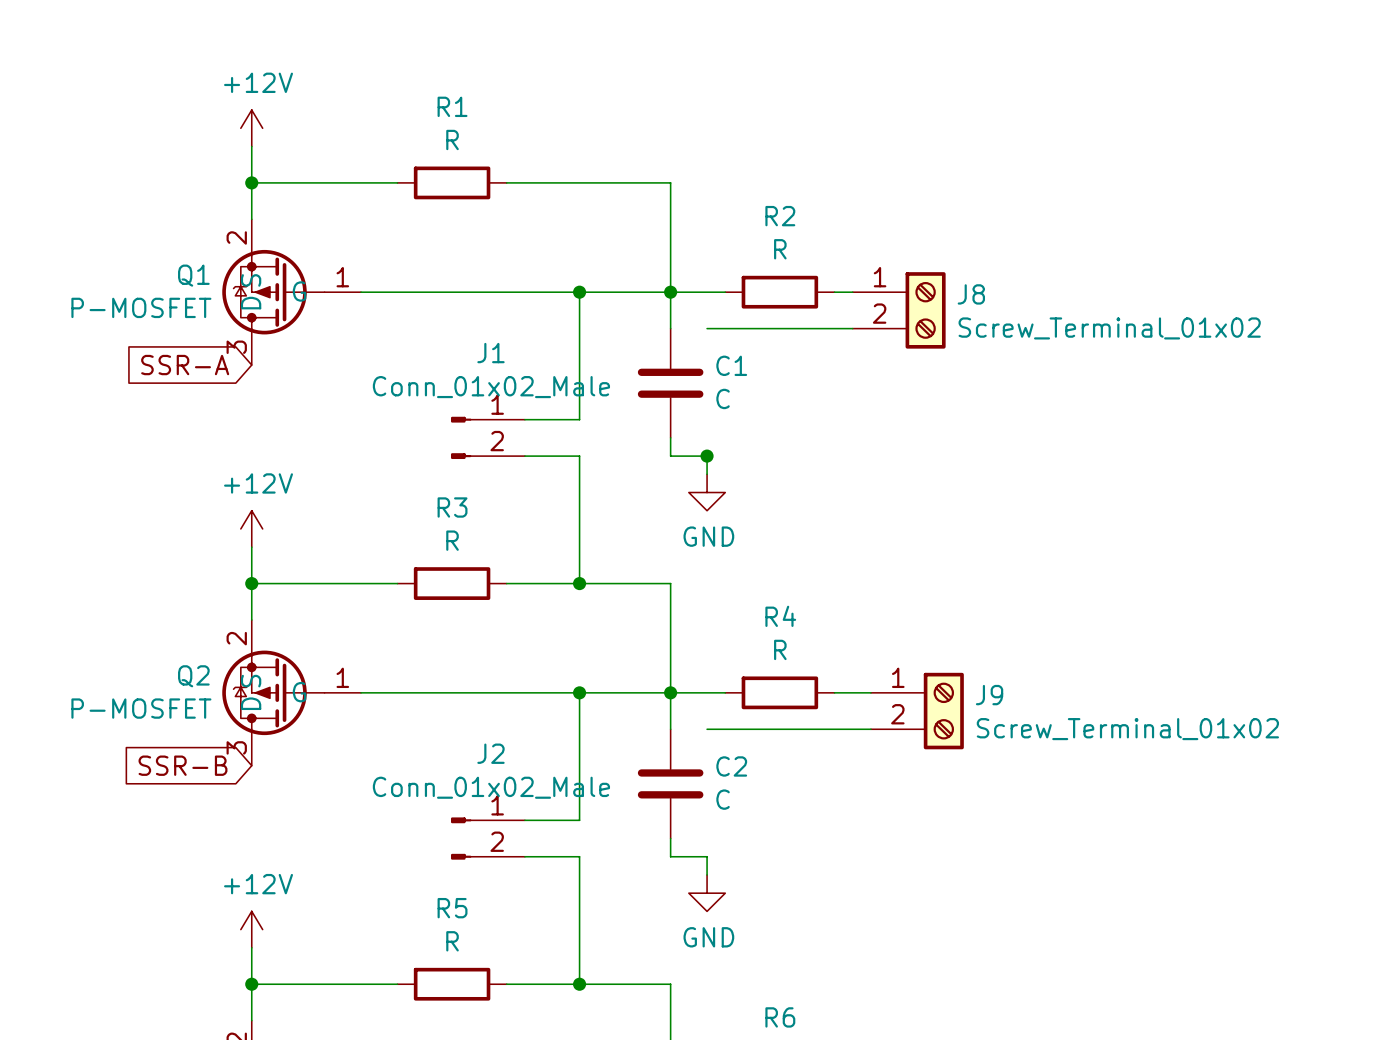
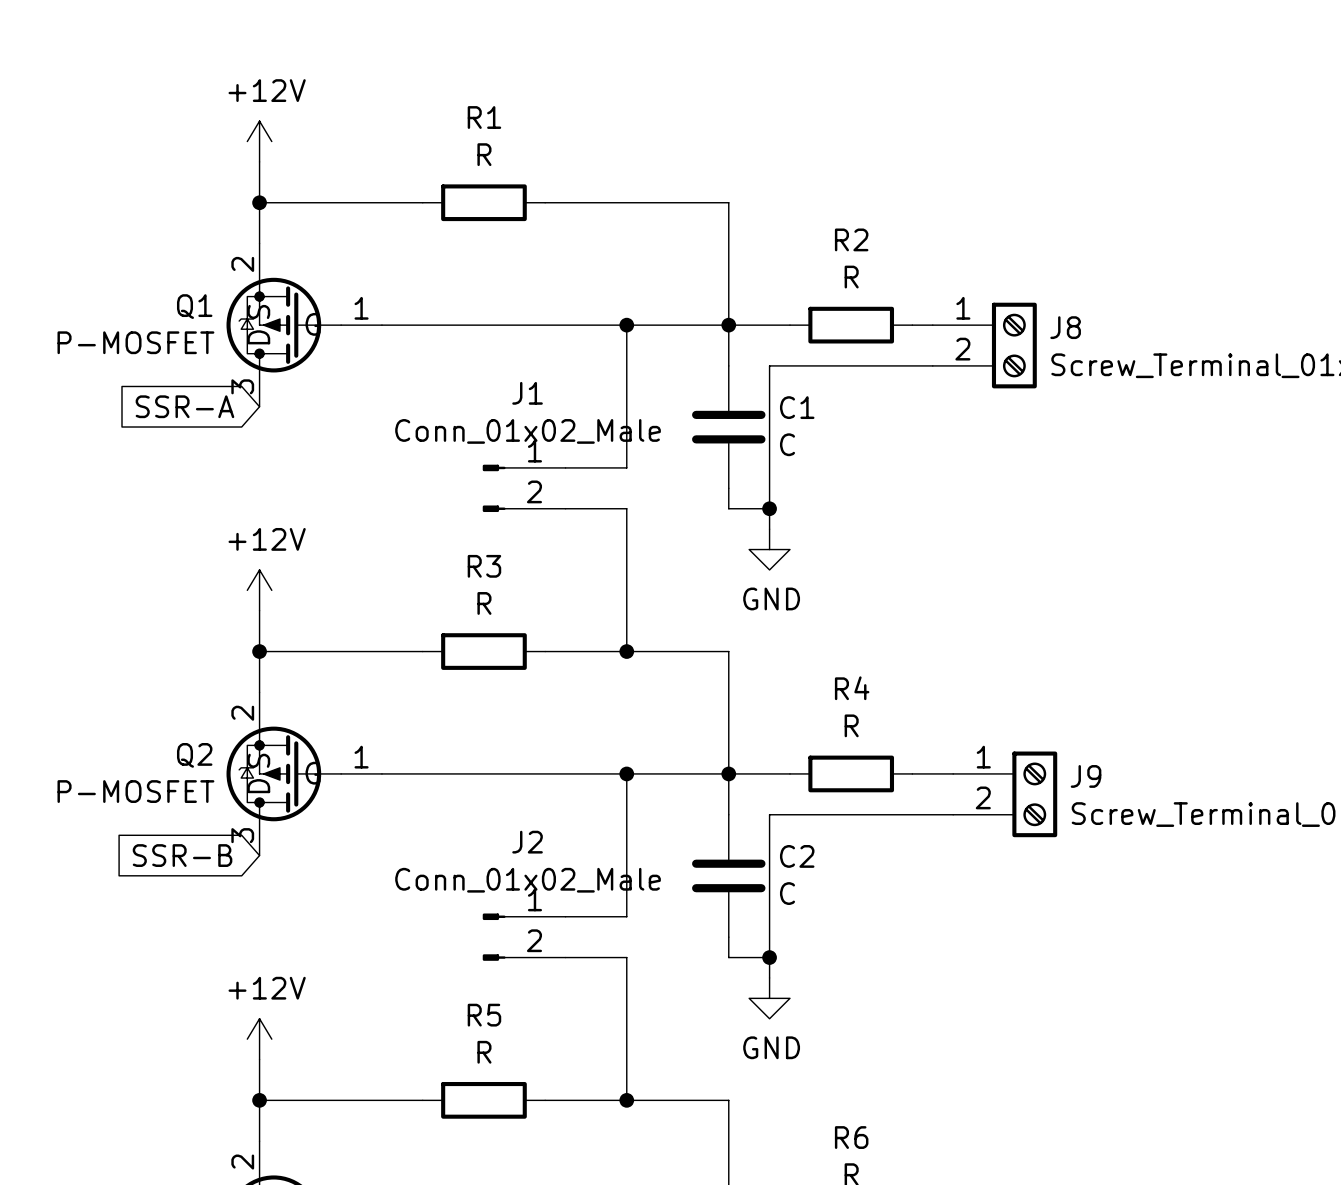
wire: none -> (769, 365) (769, 508)
wire: none -> (769, 814) (769, 957)
junction: none -> (769, 957)

